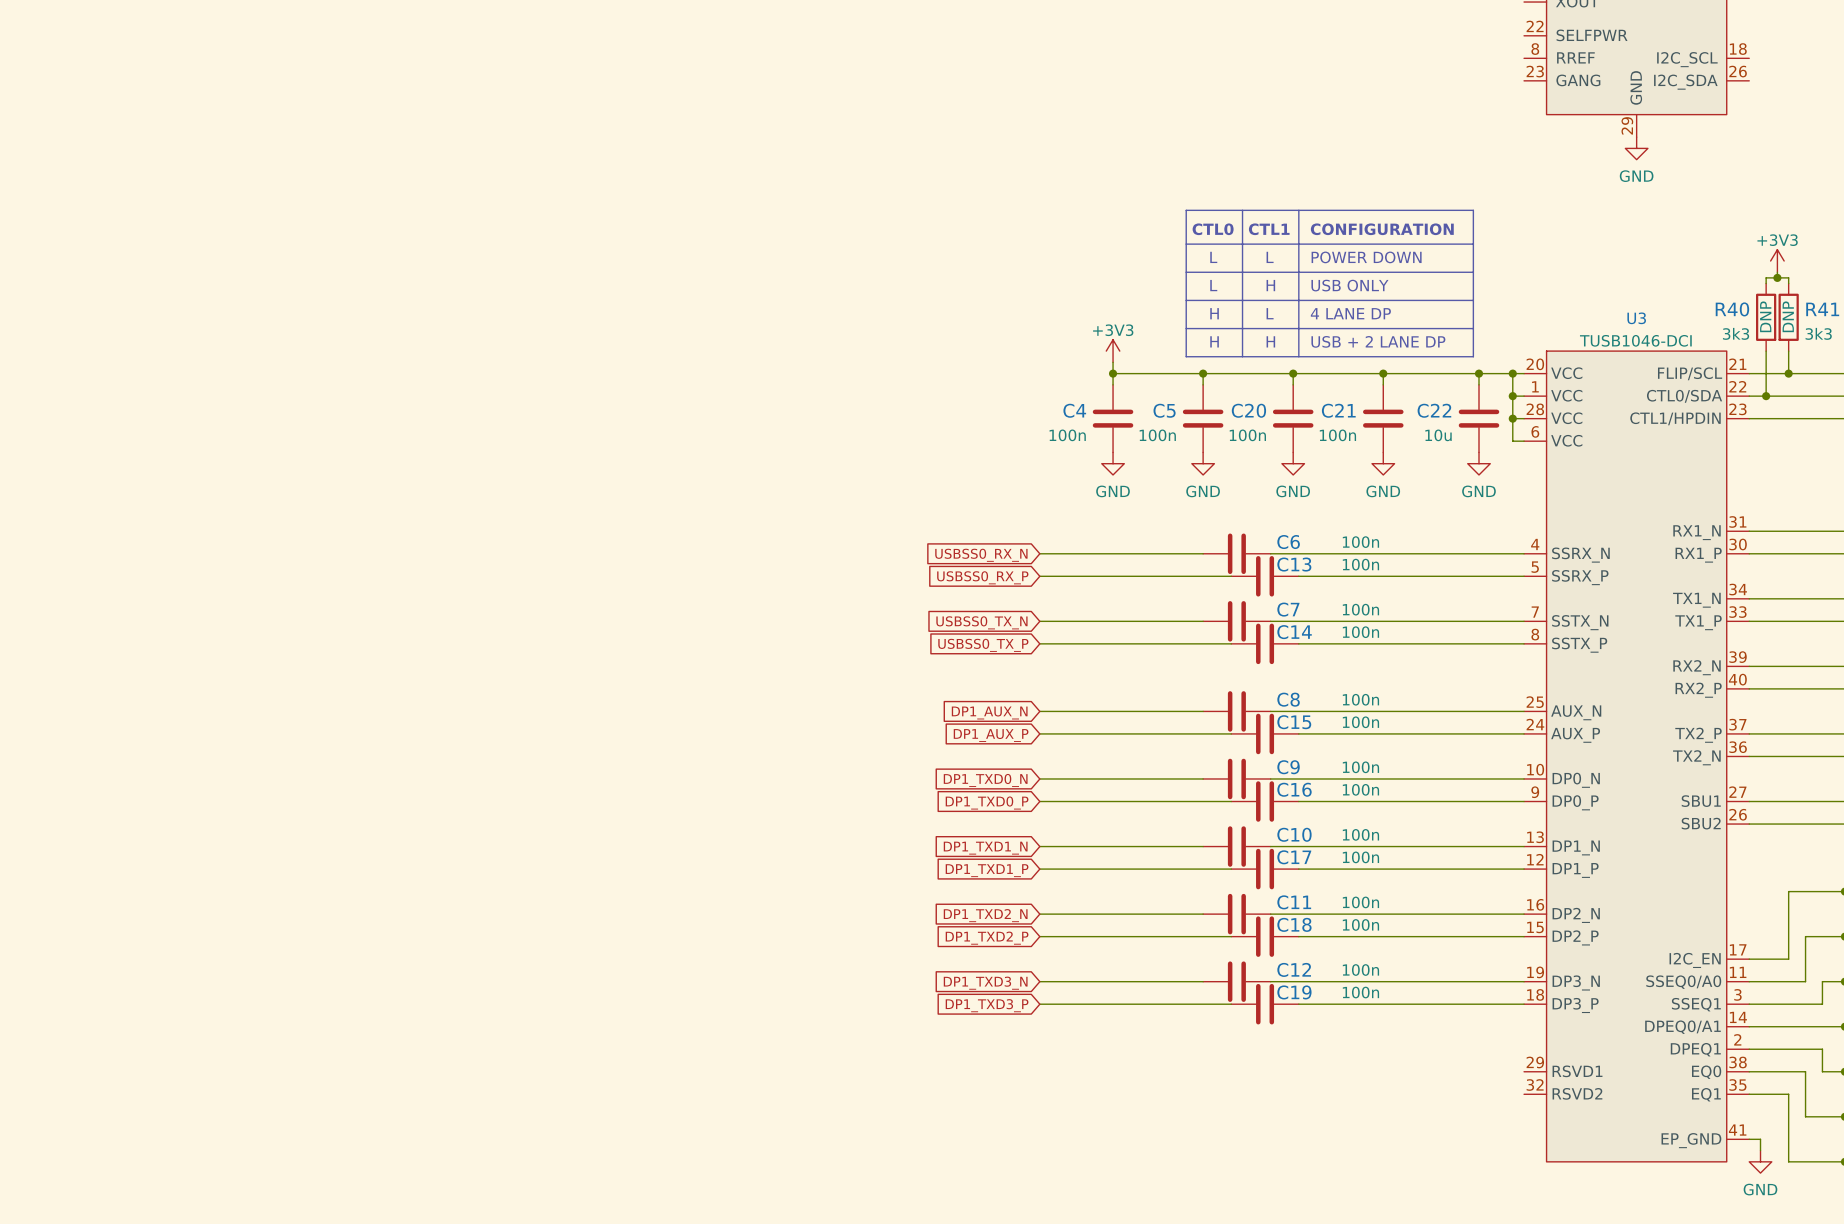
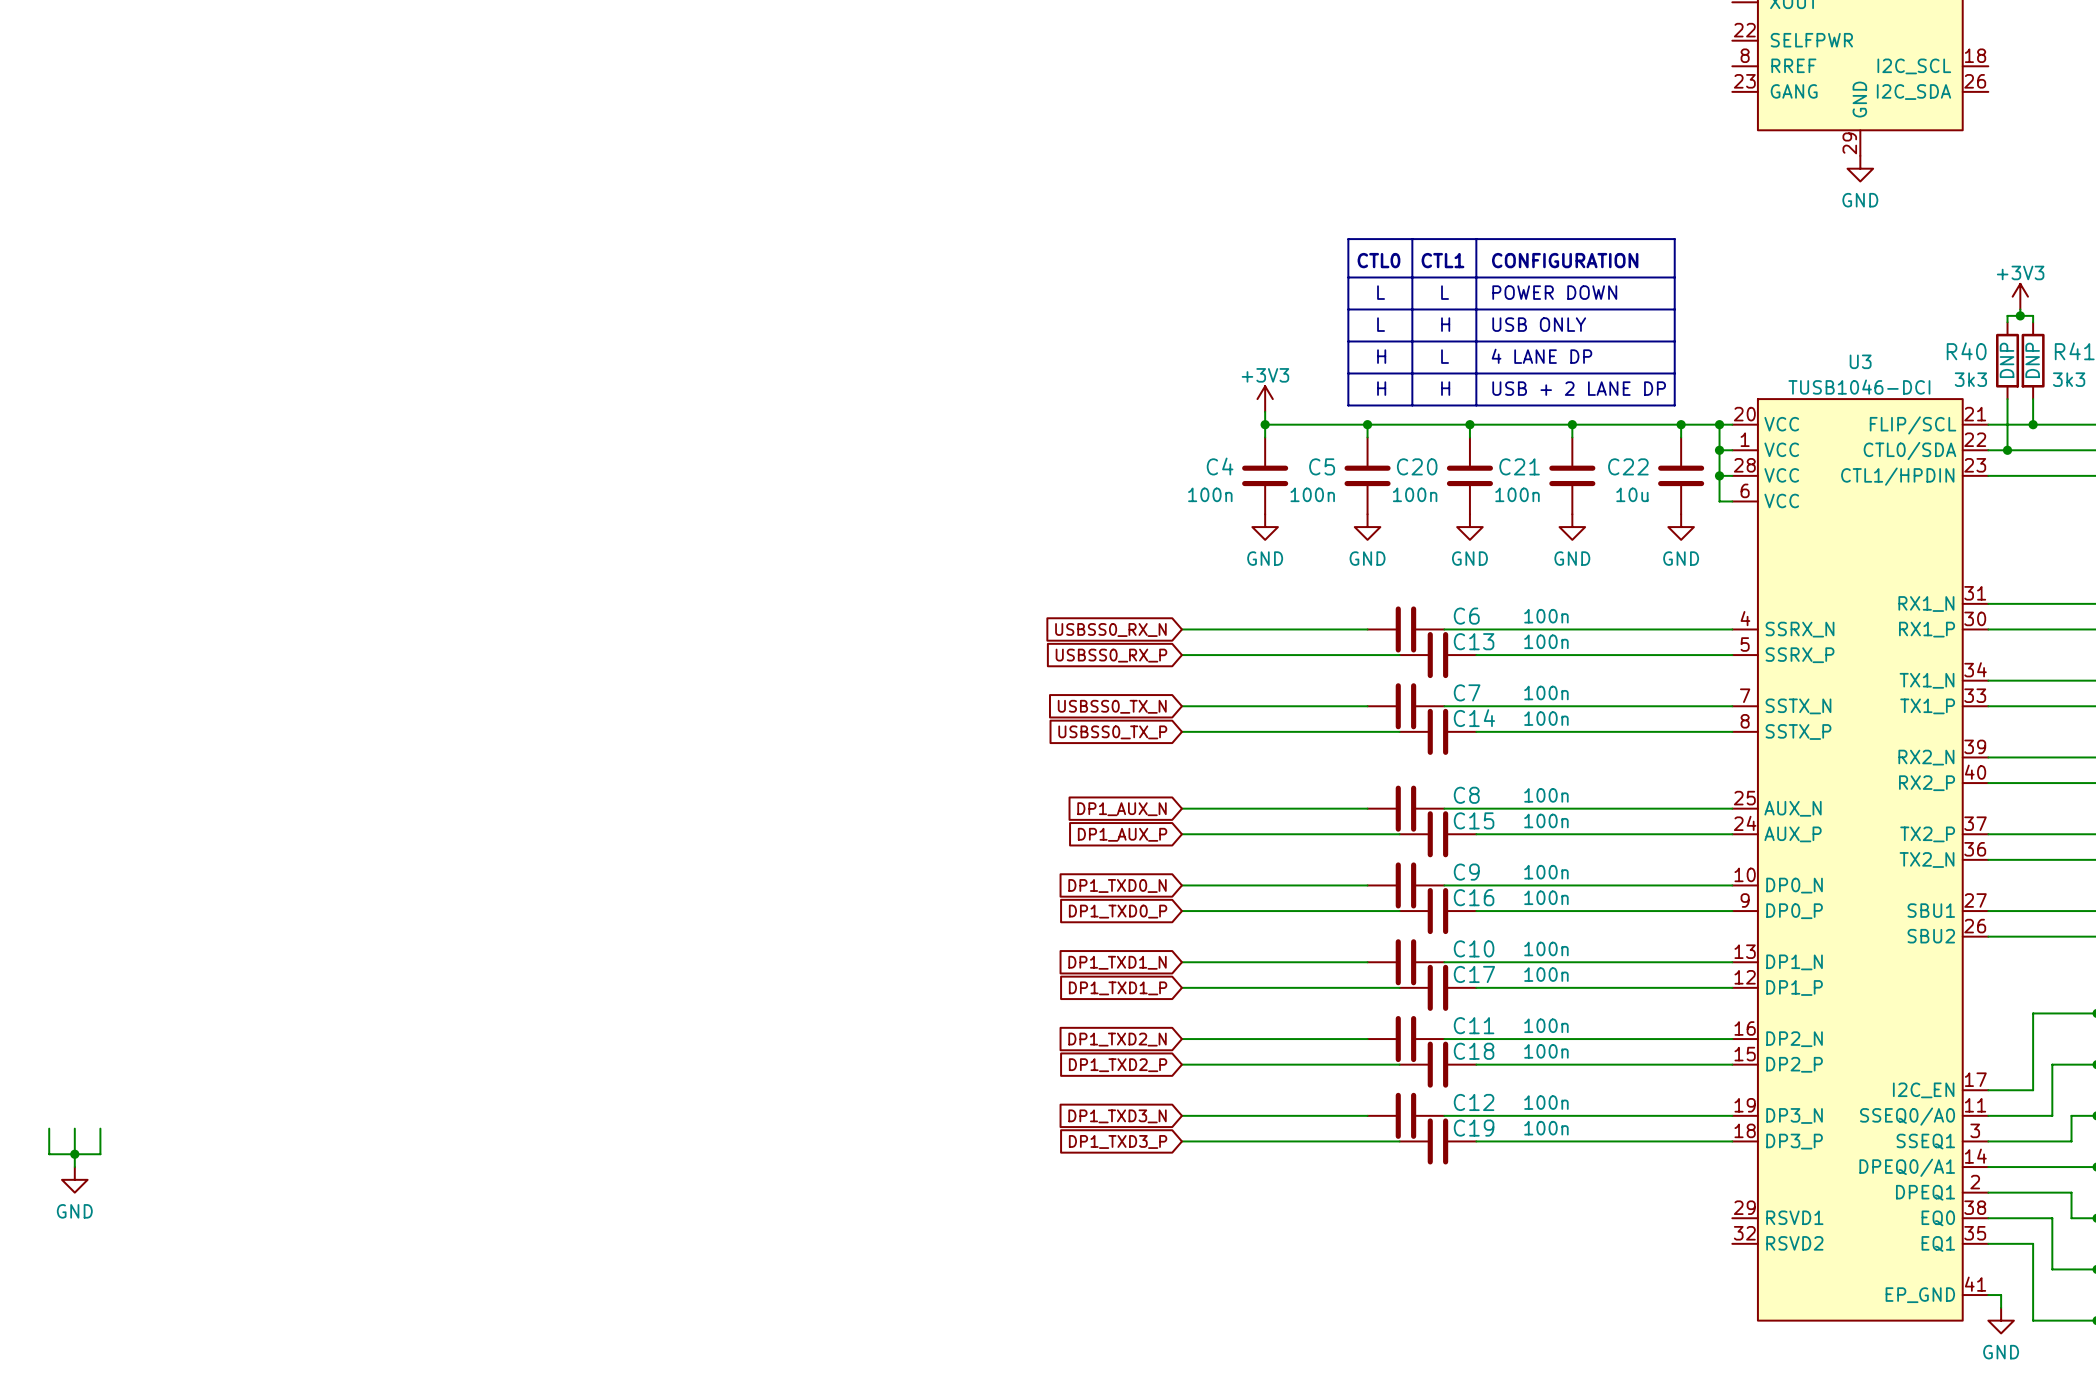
wire: none -> (49, 1128) (49, 1154) (100, 1154) (100, 1128)
wire: none -> (74, 1128) (74, 1167)
junction: none -> (74, 1154)
power symbol: none -> GND (74, 1179)

